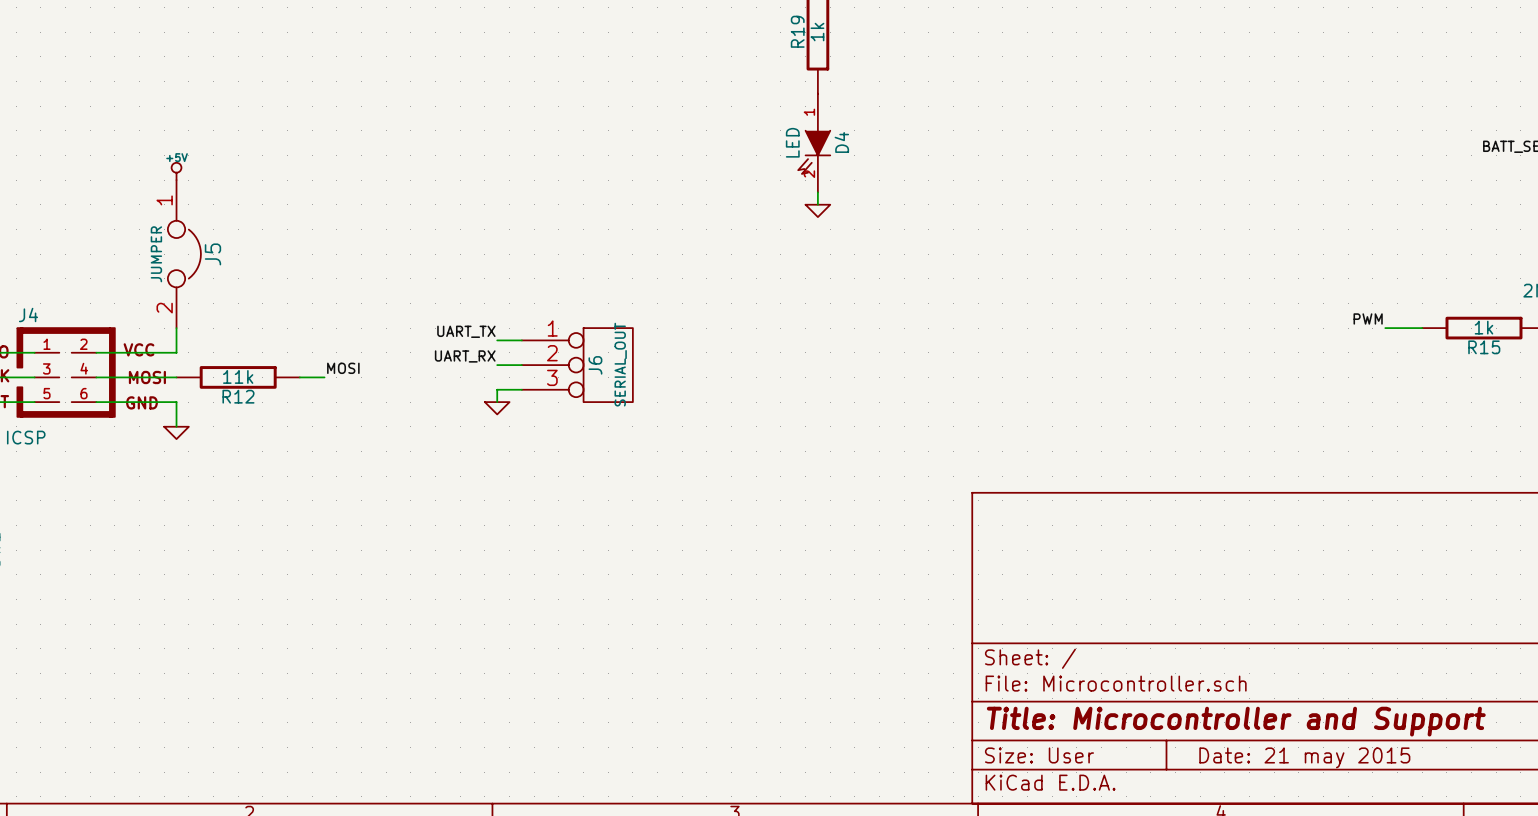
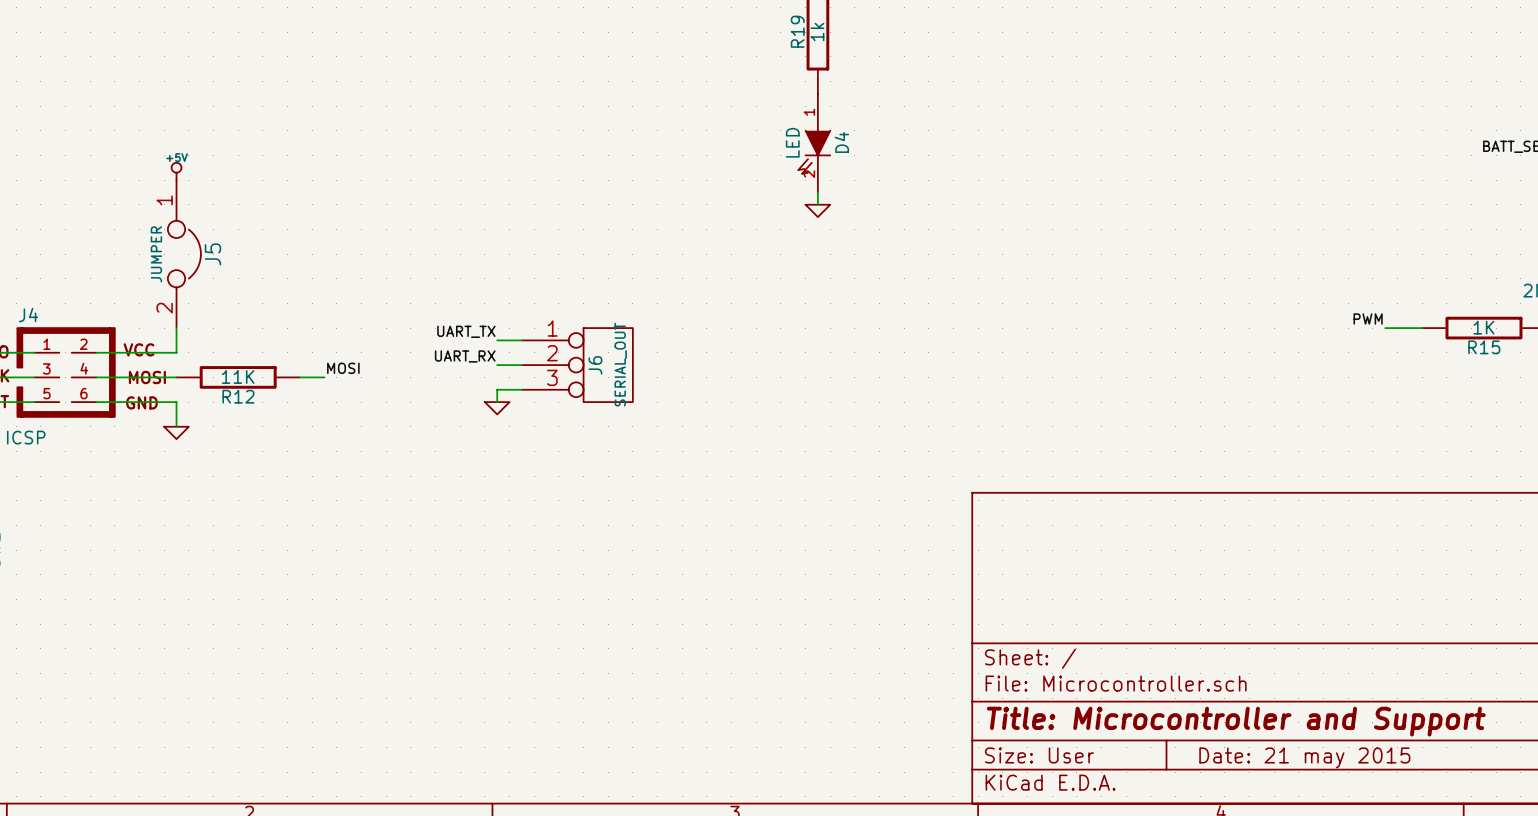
R15 value: 1k (1483, 327) -> 1K (1483, 327)
R12 value: 11k (238, 376) -> 11K (238, 376)

